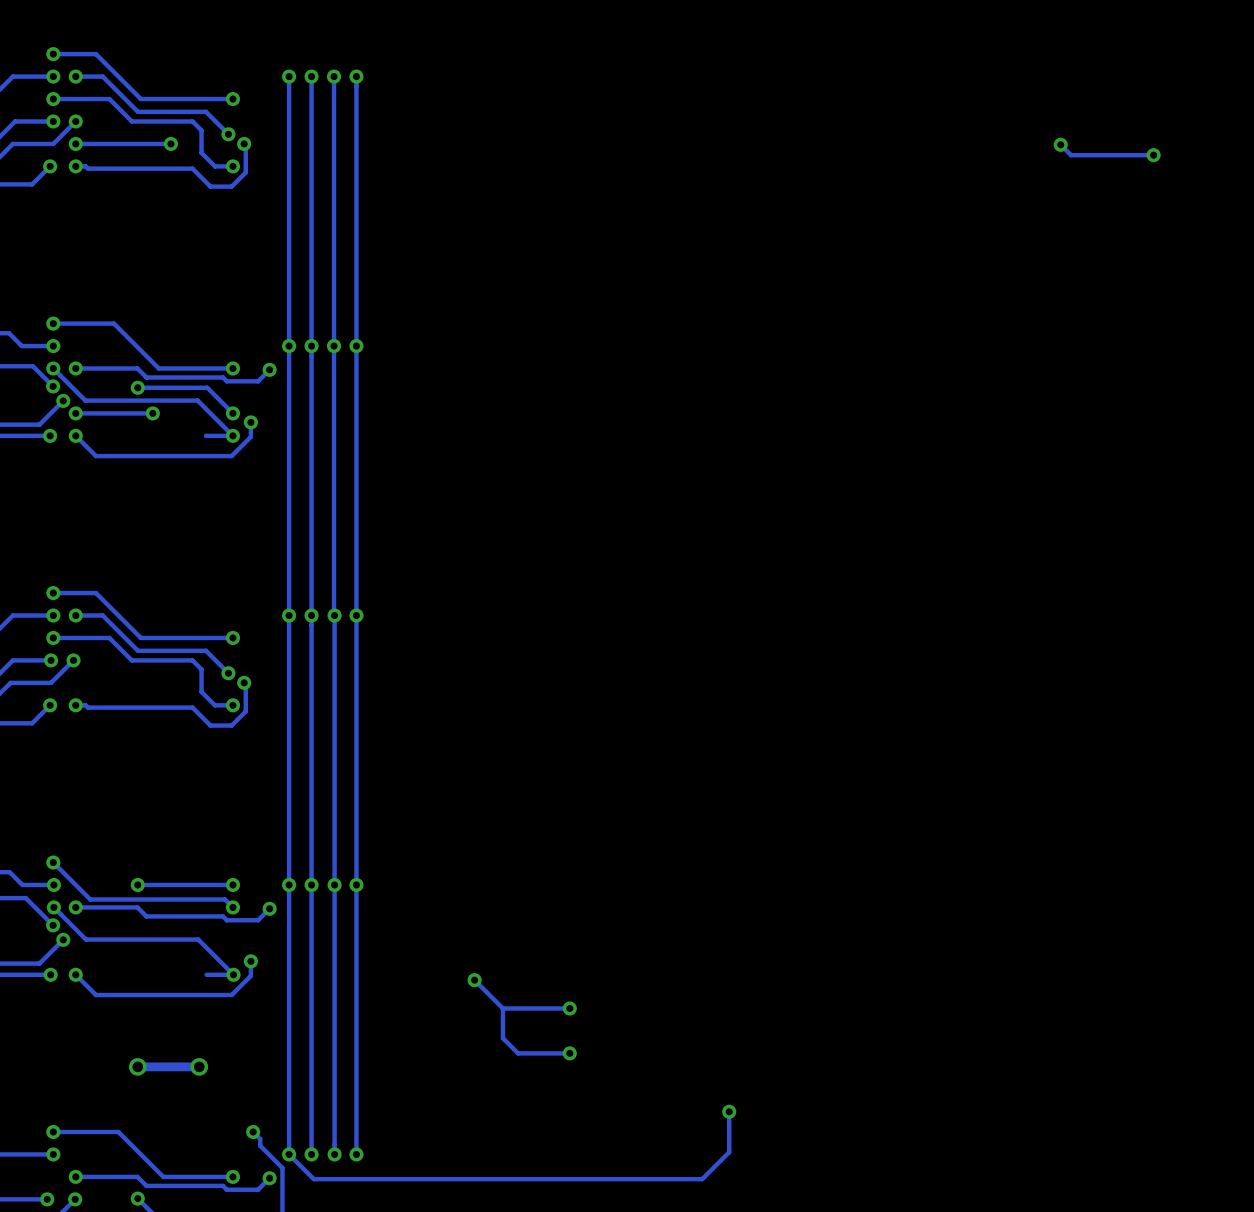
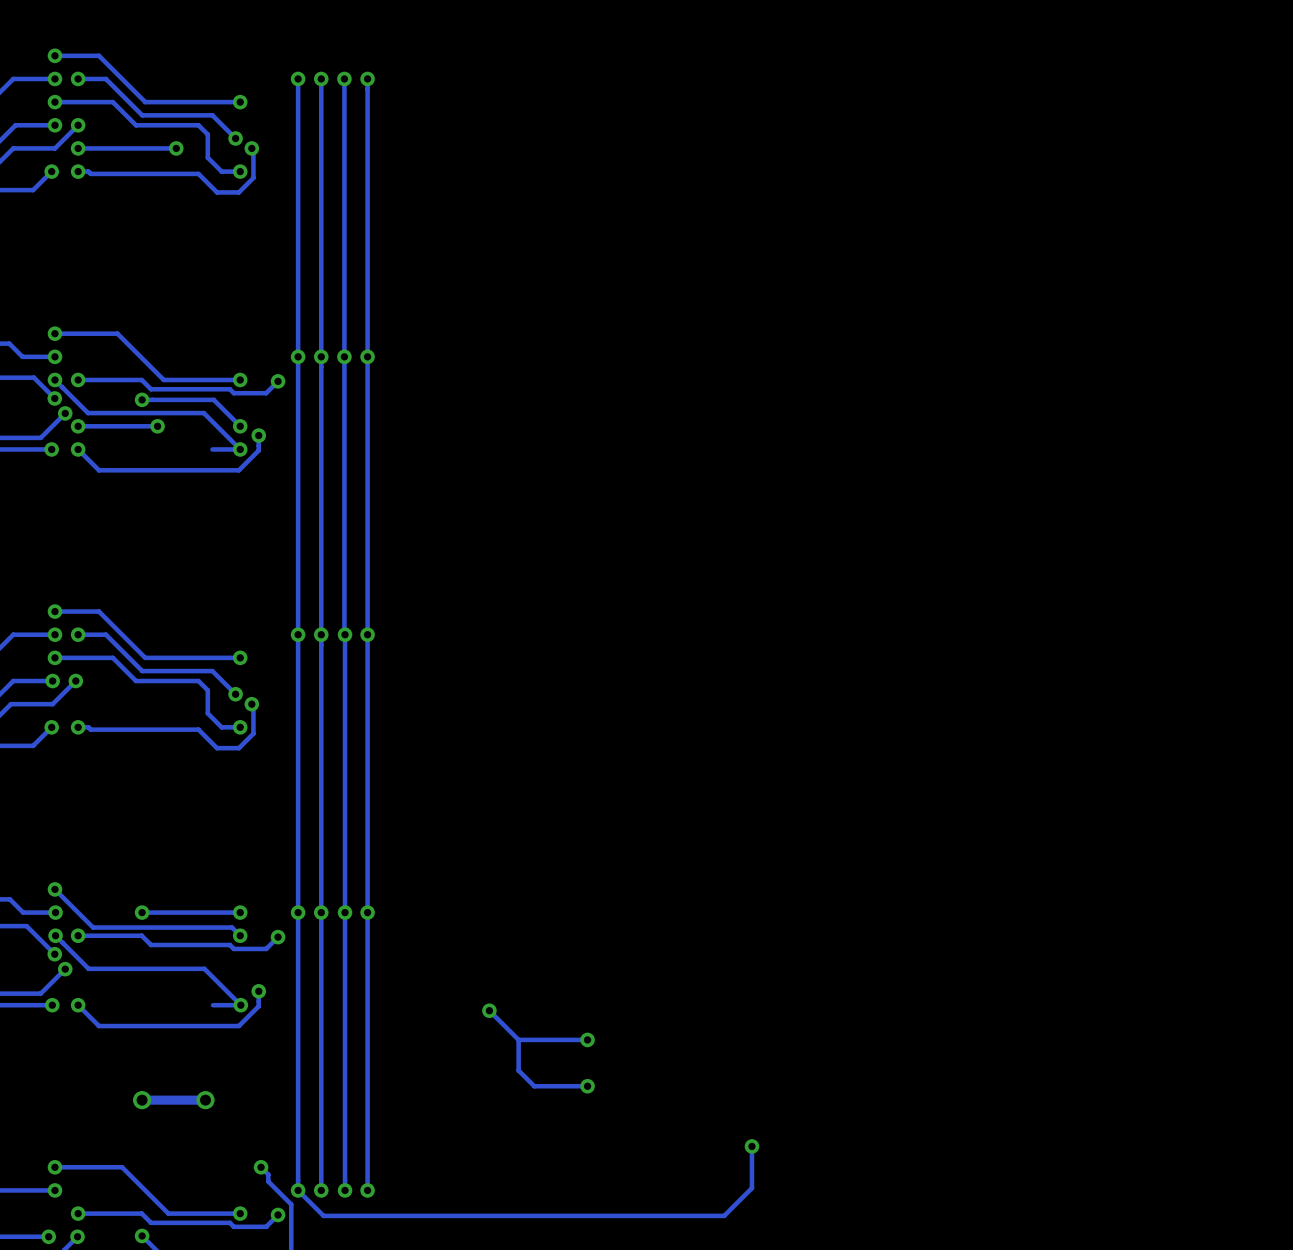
track: (1060, 144) (1071, 155) (1153, 155) -> none
via: (1060, 144) -> none
via: (1153, 155) -> none

